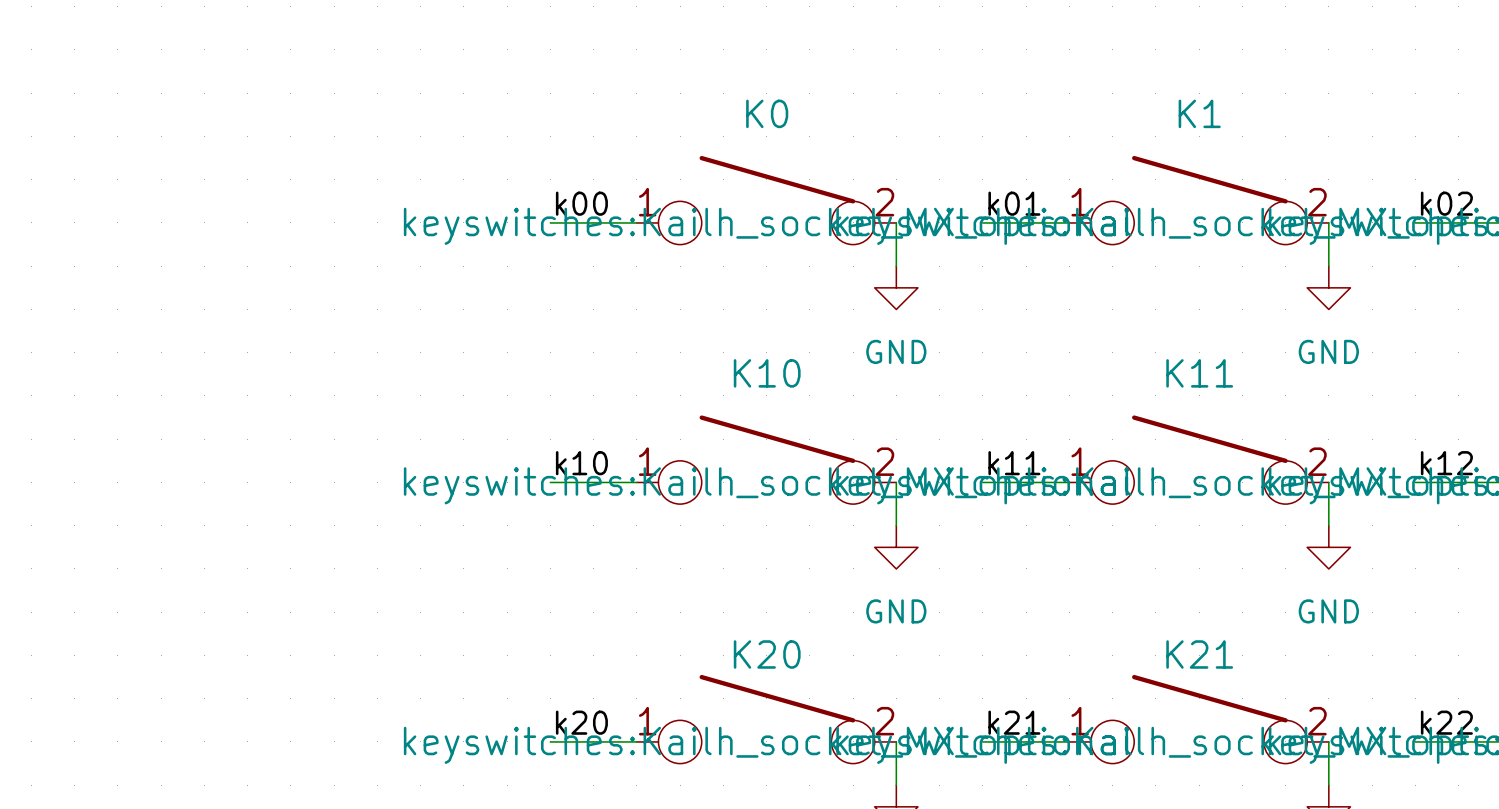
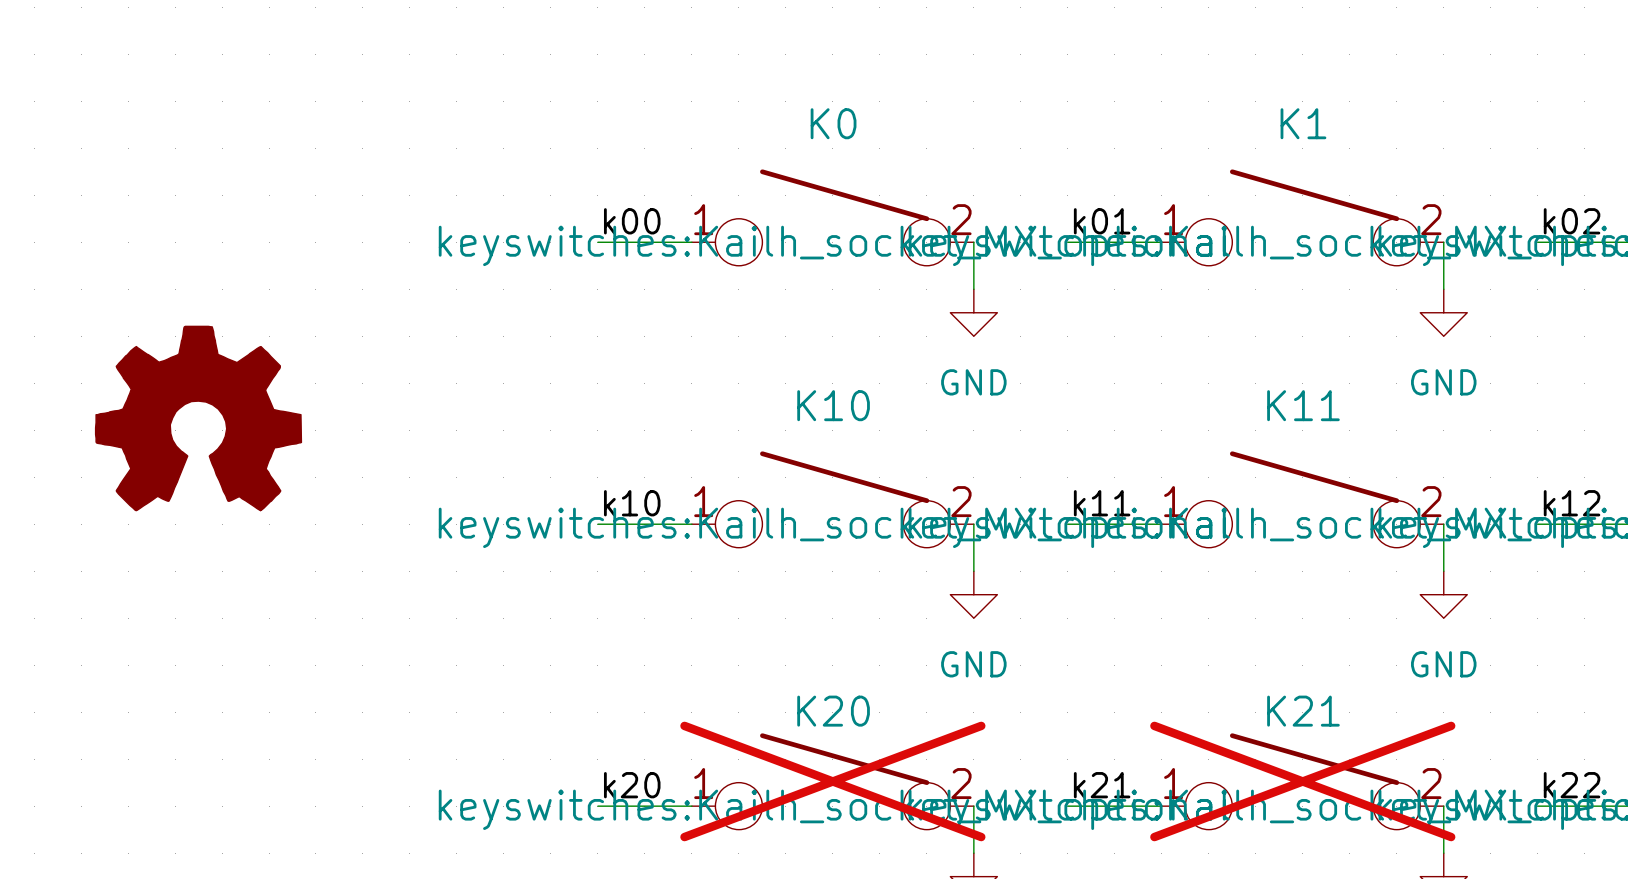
power symbol: none -> (198, 418)
K20 do-not-place cross: none -> (832, 781)
K21 do-not-place cross: none -> (1302, 781)

